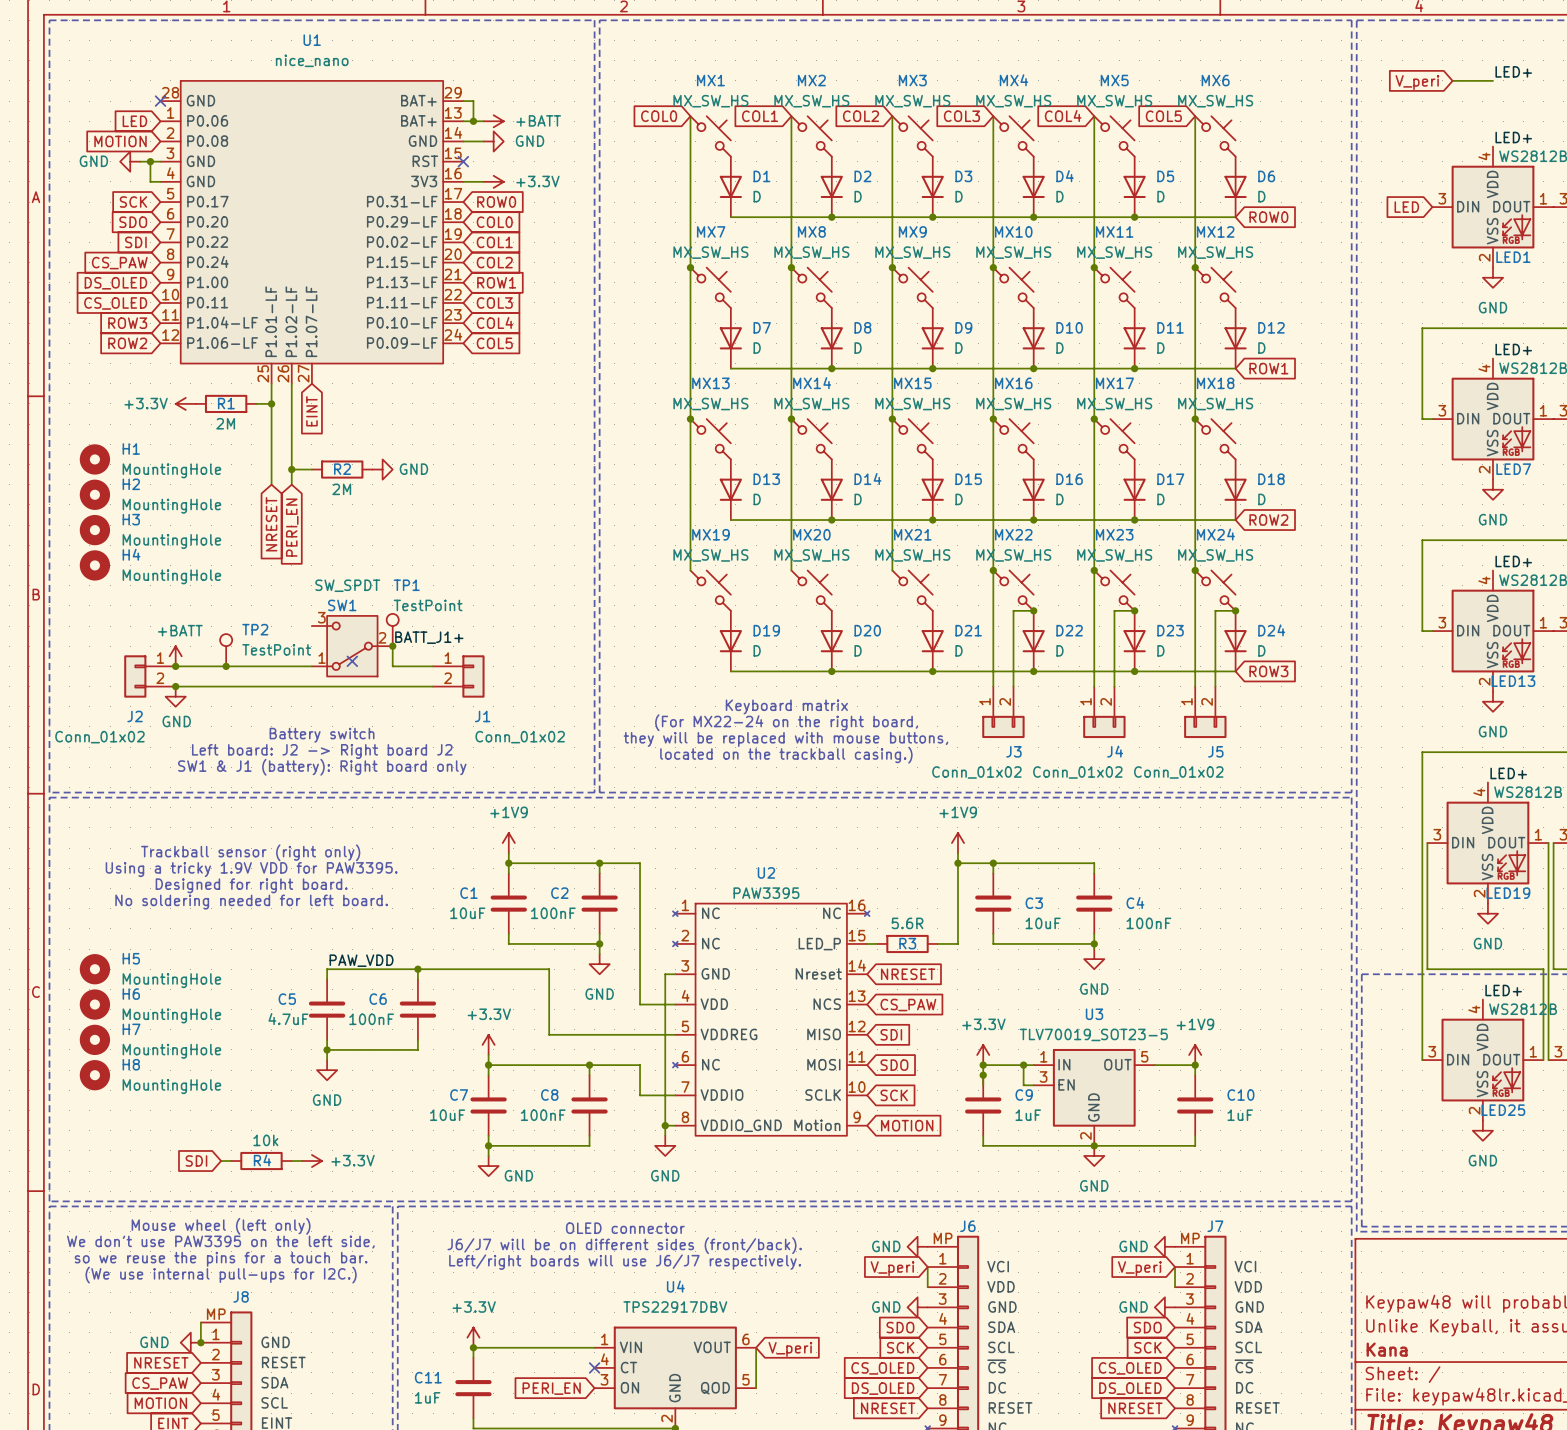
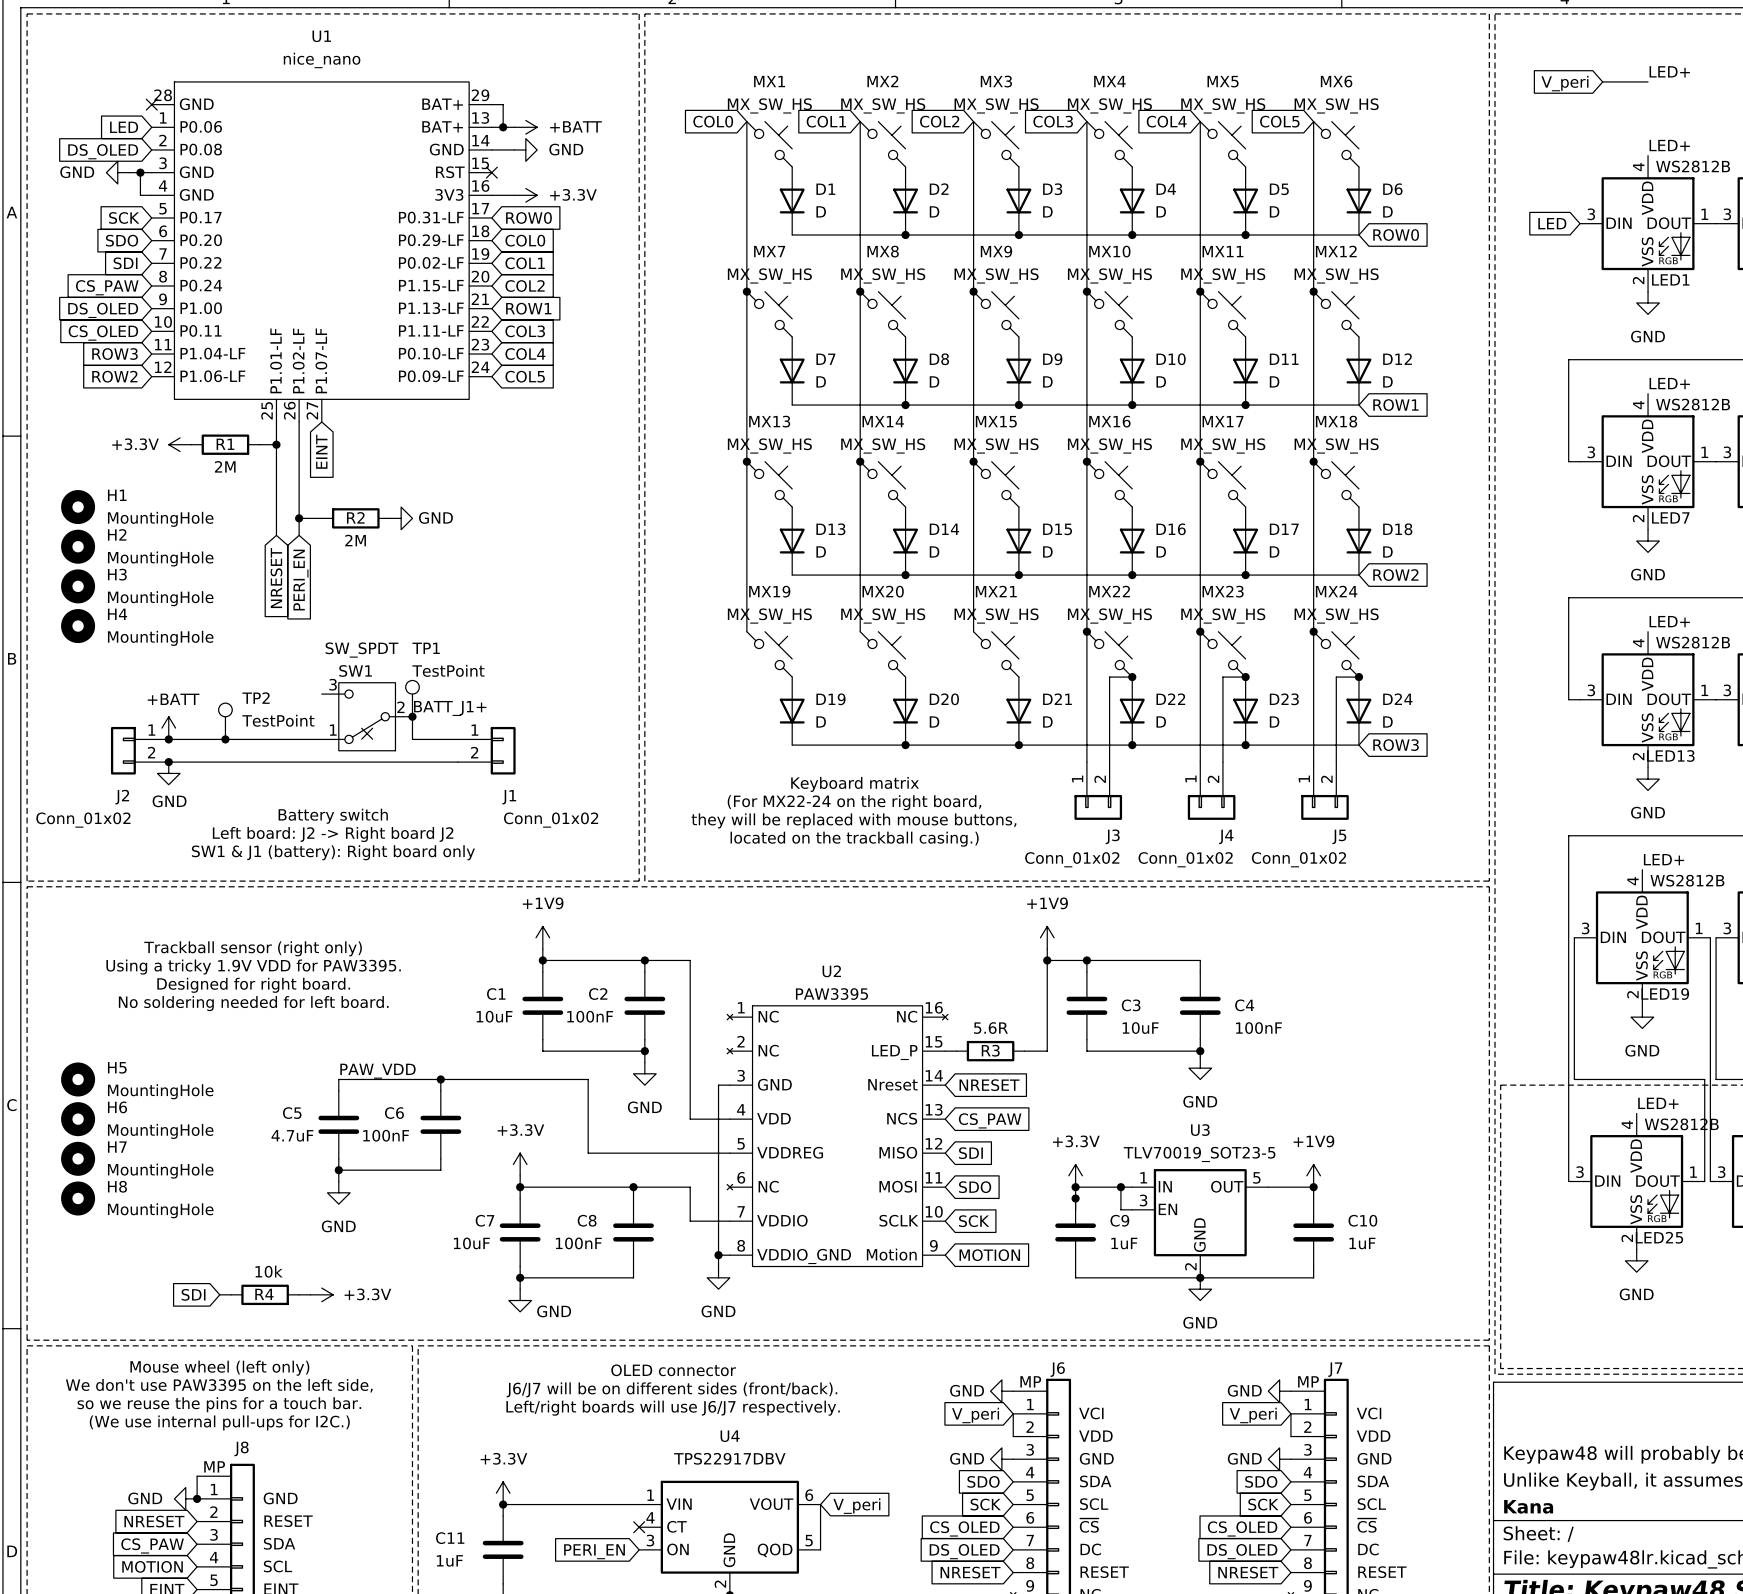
global label: MOTION (120, 141) -> DS_OLED (103, 151)

